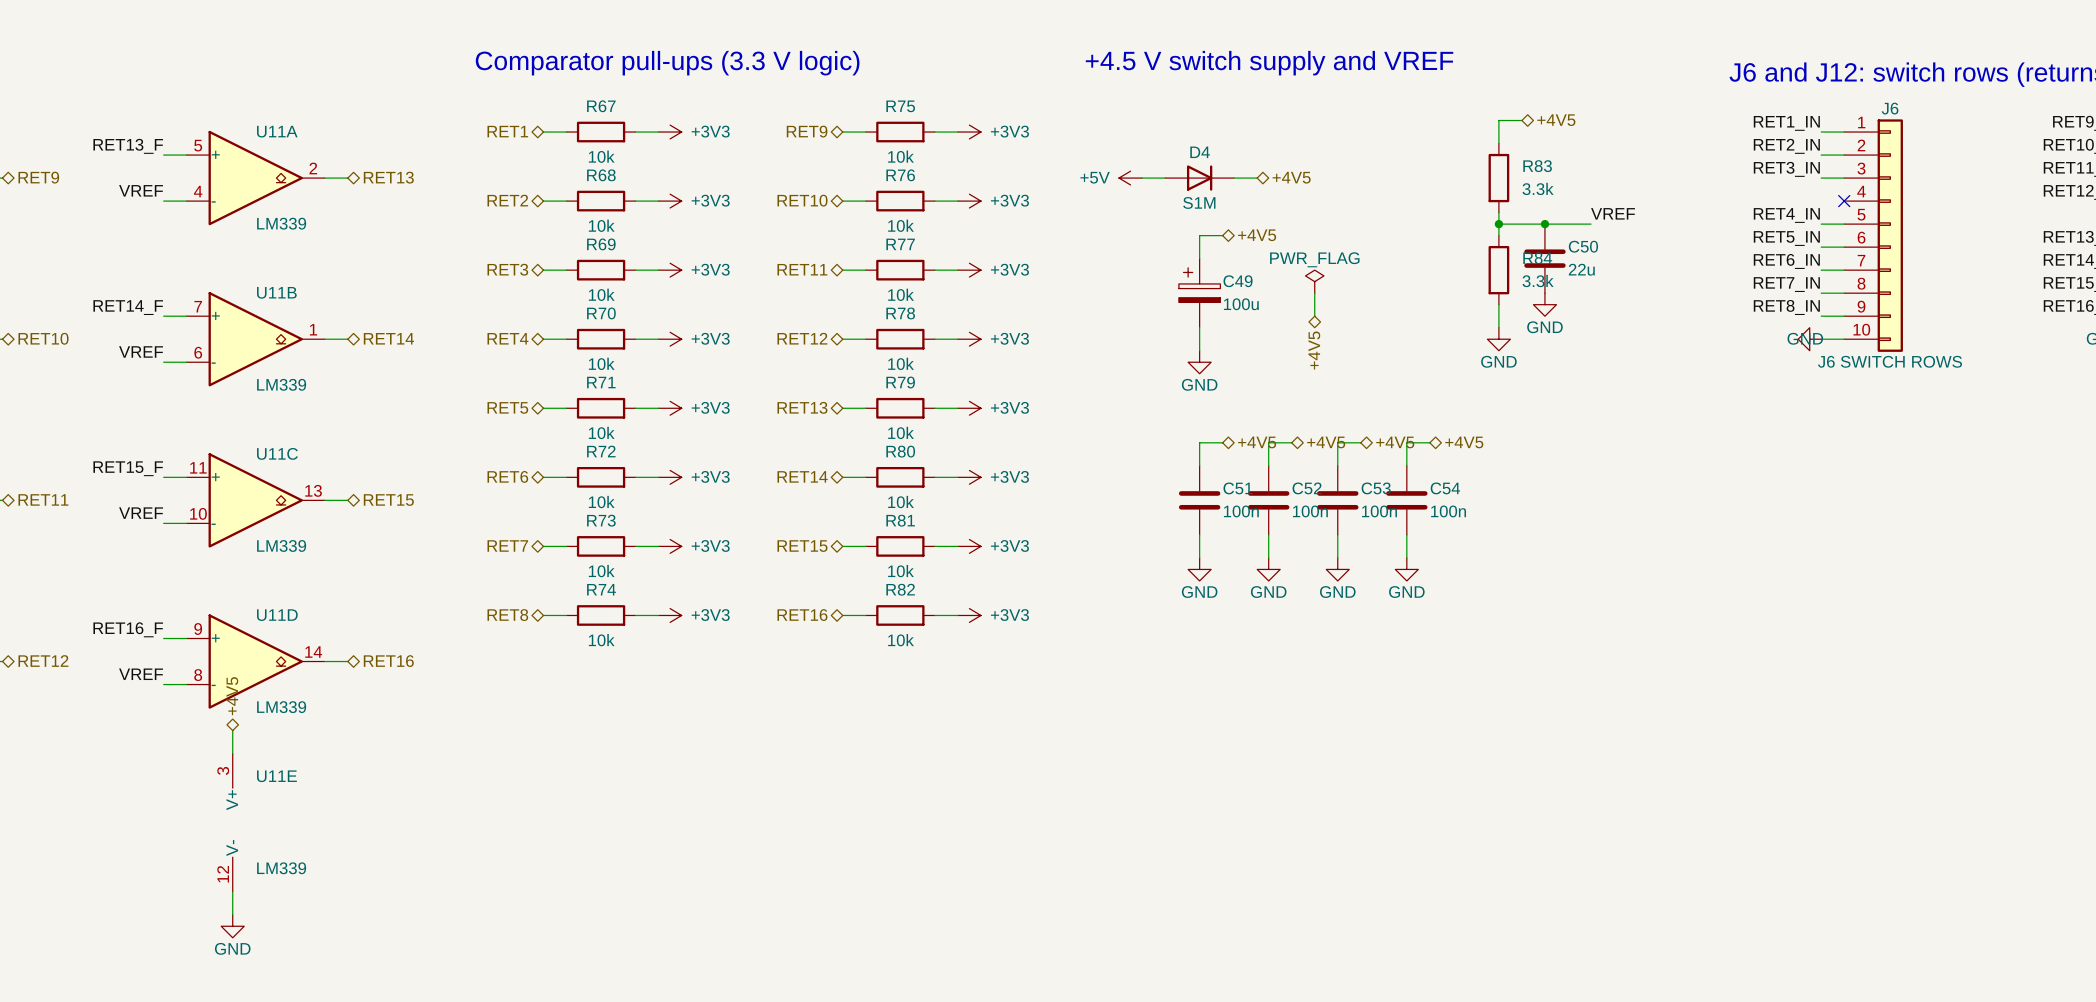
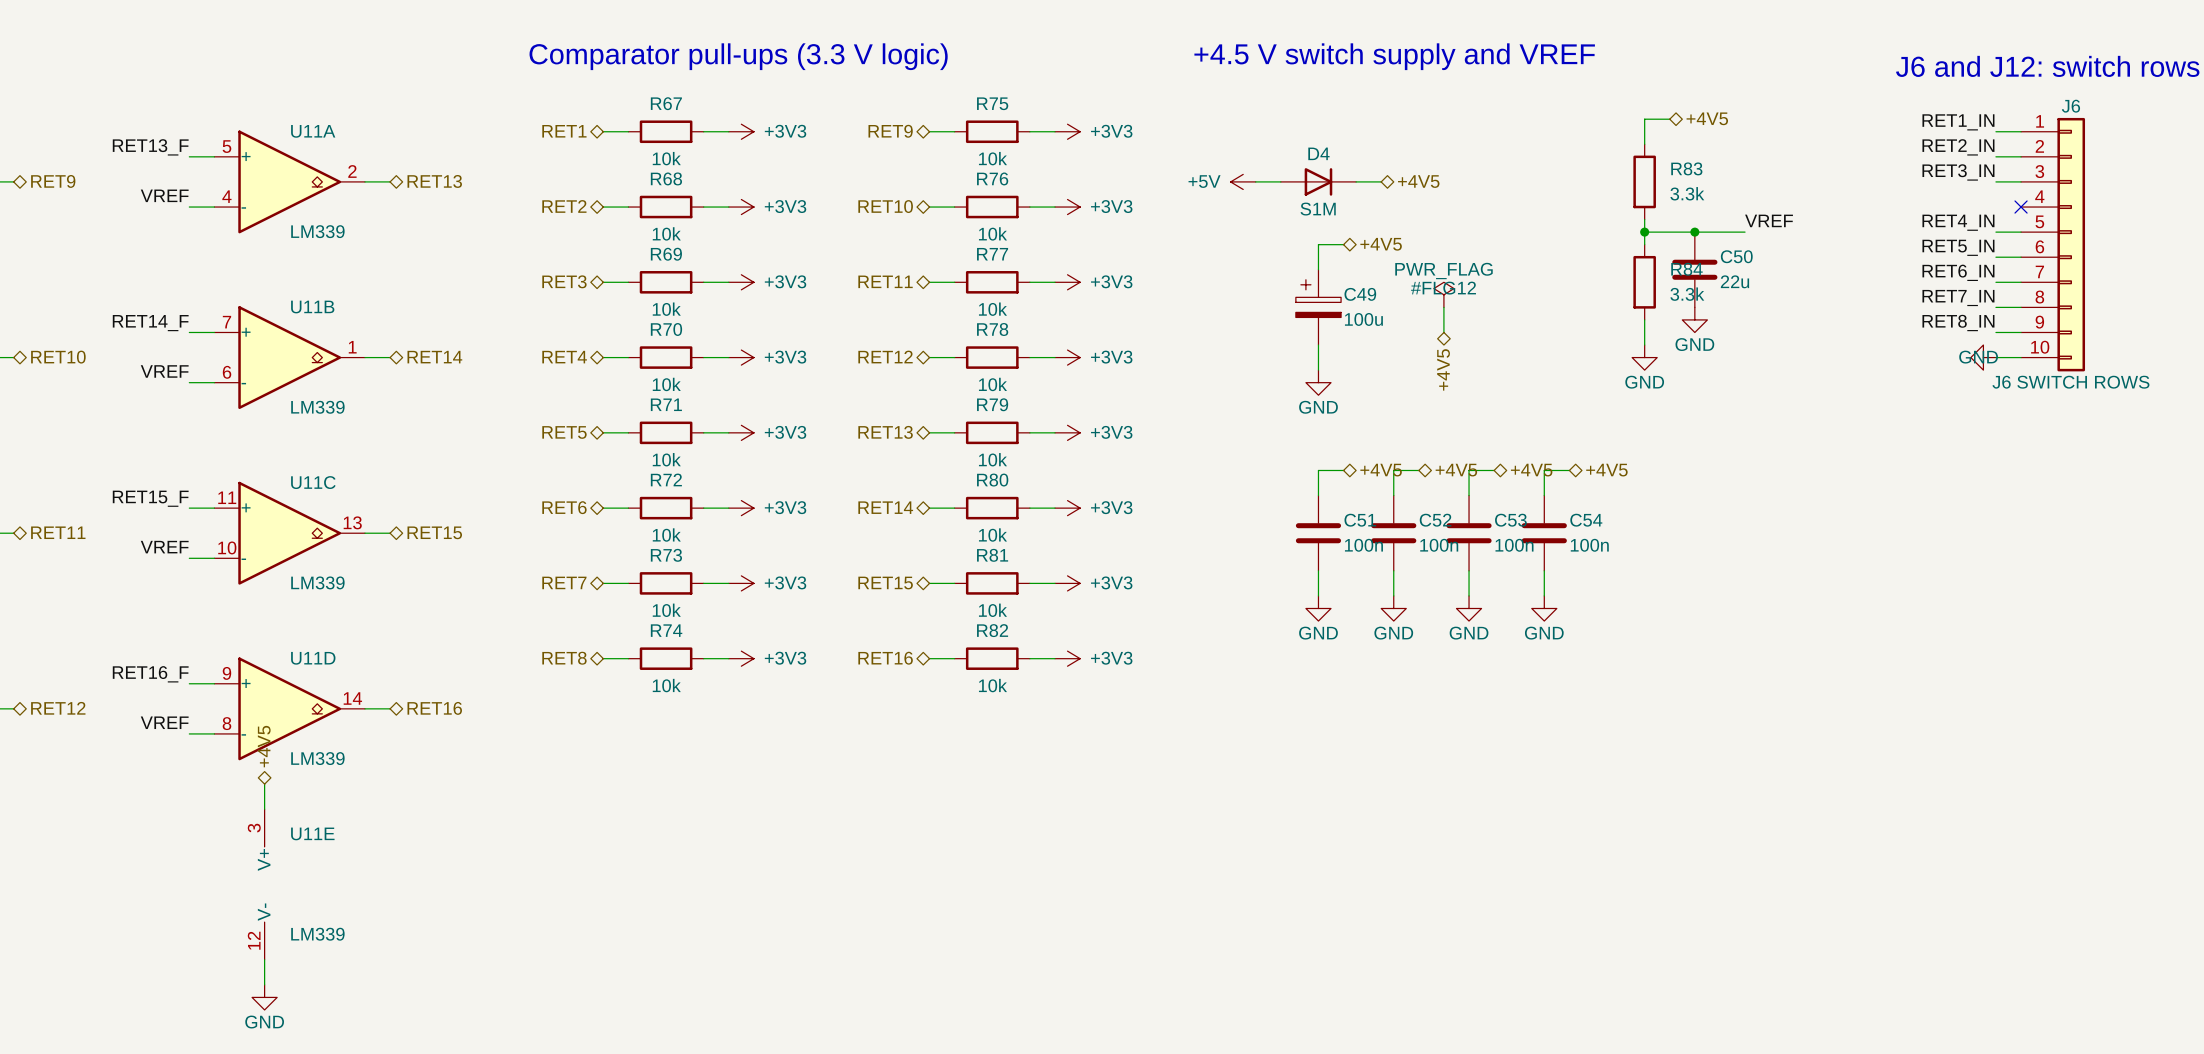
#FLG12 name: none -> #FLG12 (1443, 288)

